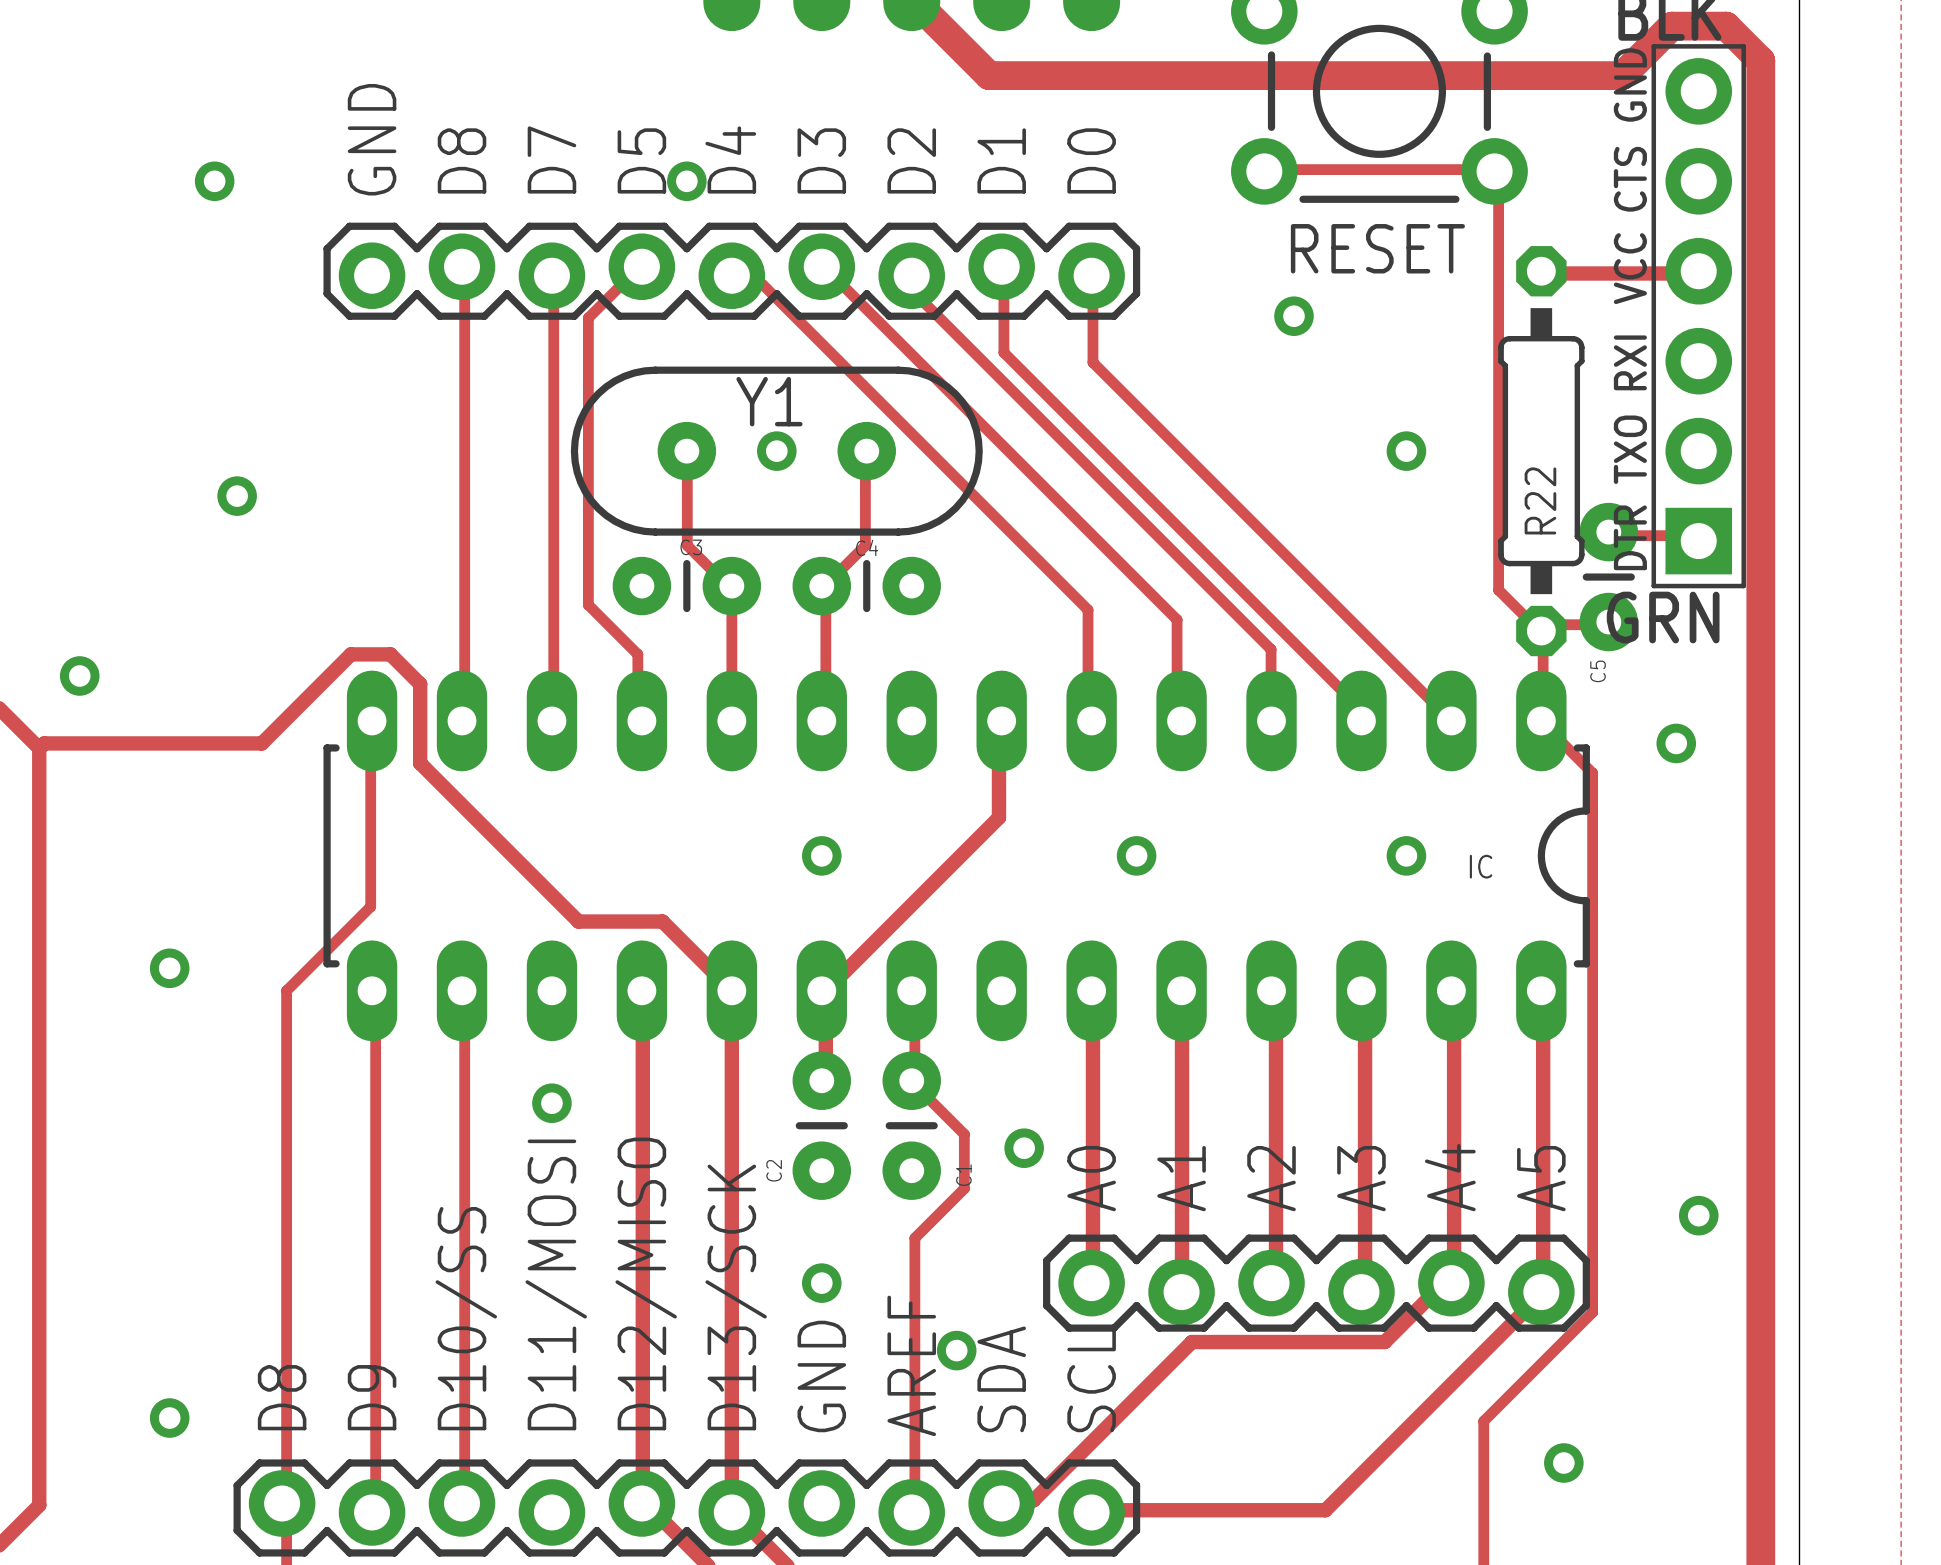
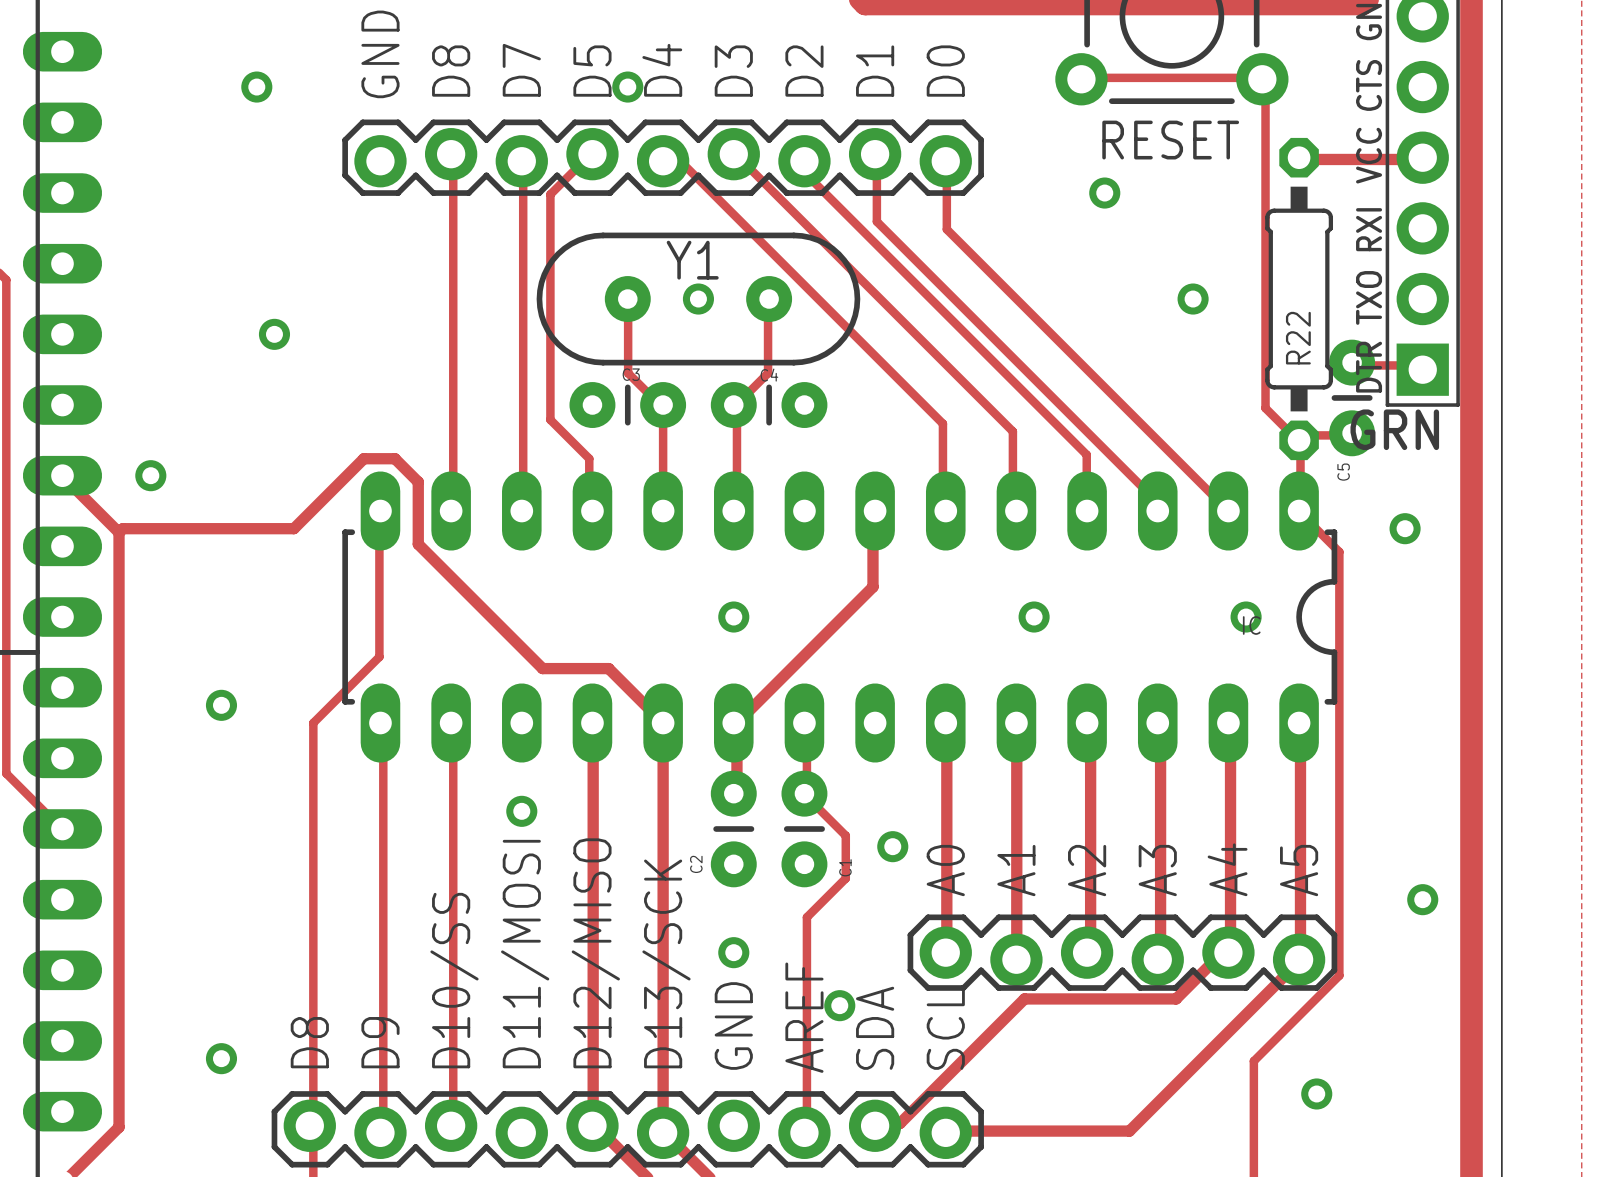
via position: (1136, 855) -> (1034, 617)
via position: (1406, 855) -> (1246, 617)

